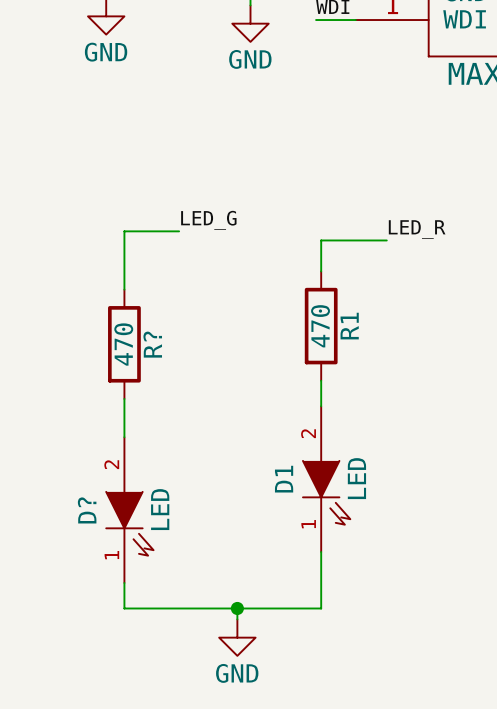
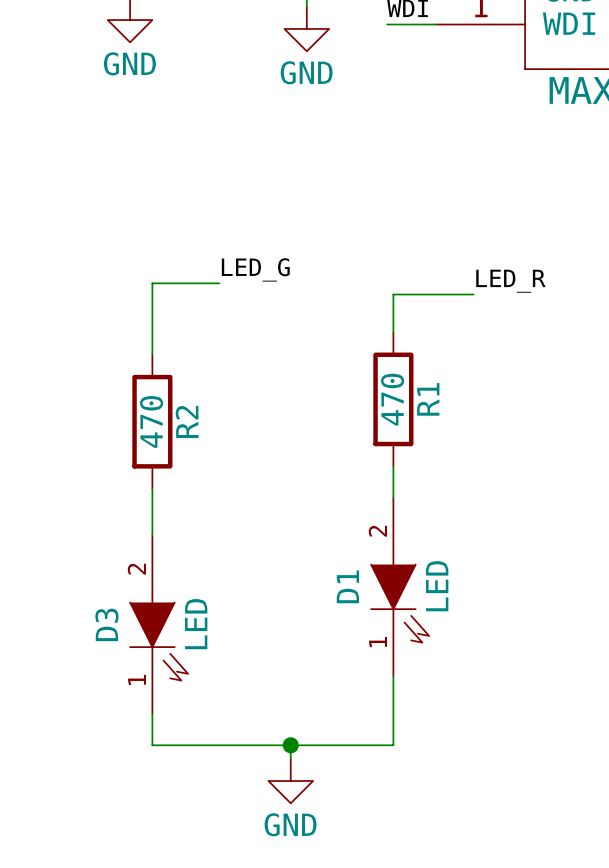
R? name: R? (152, 344) -> R2 (187, 421)
D? name: D? (87, 510) -> D3 (106, 624)

